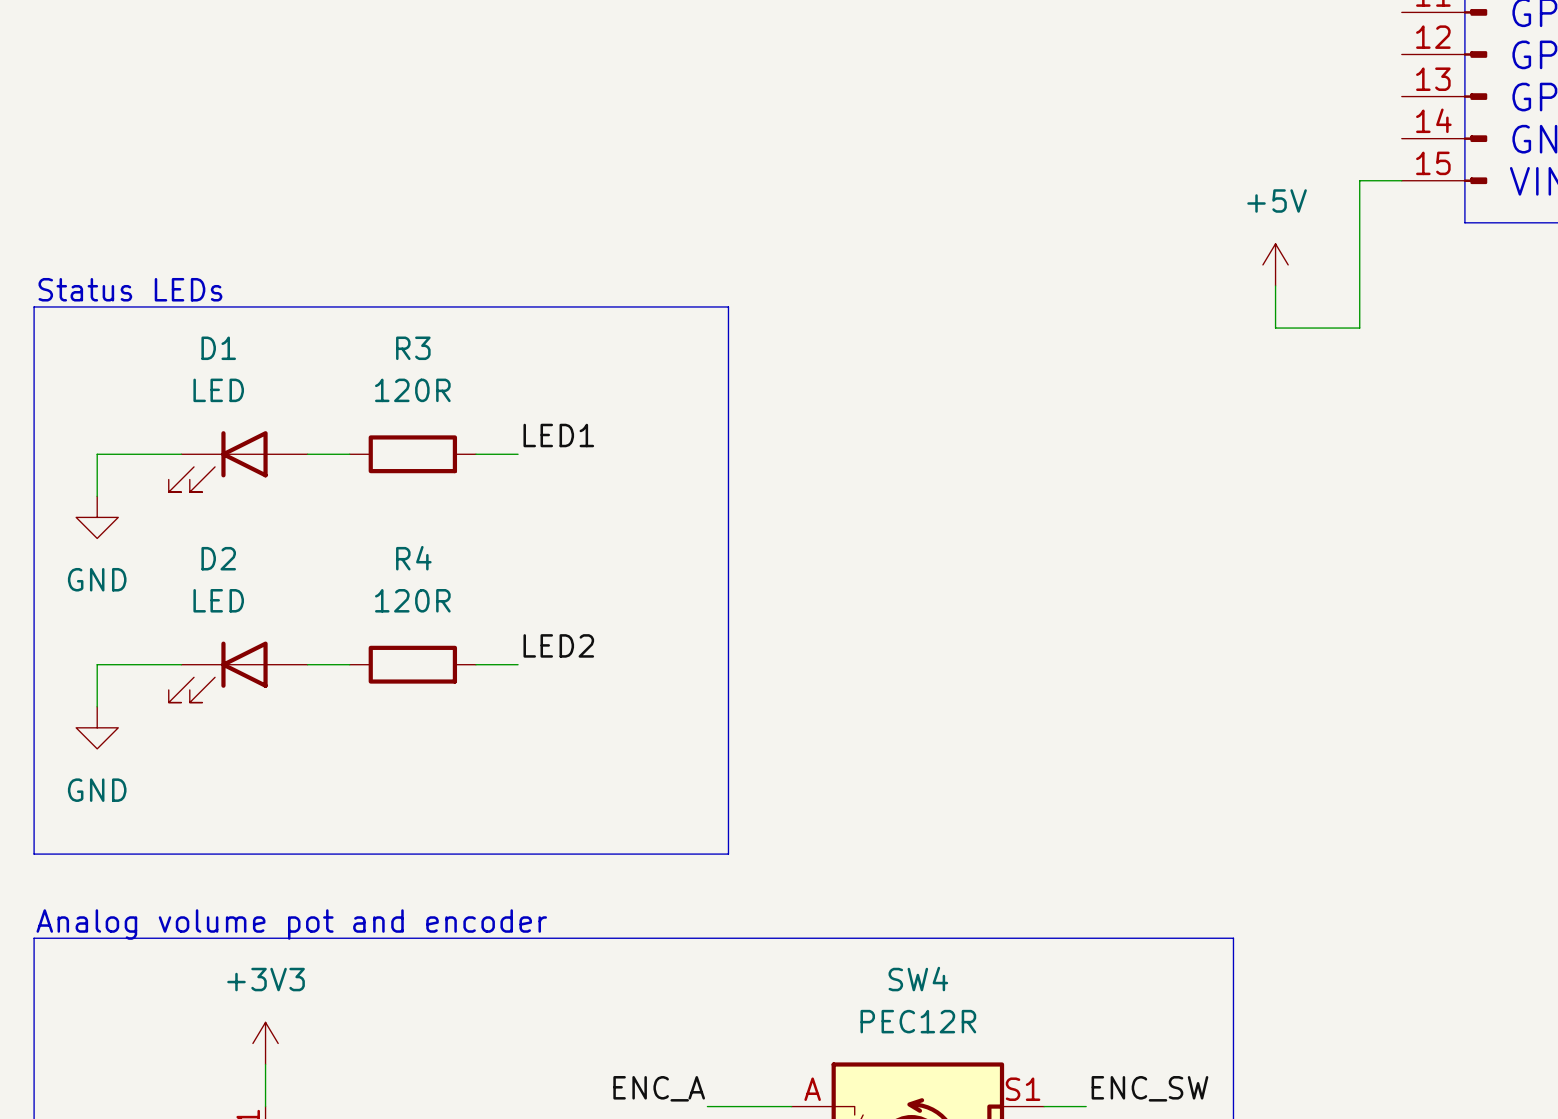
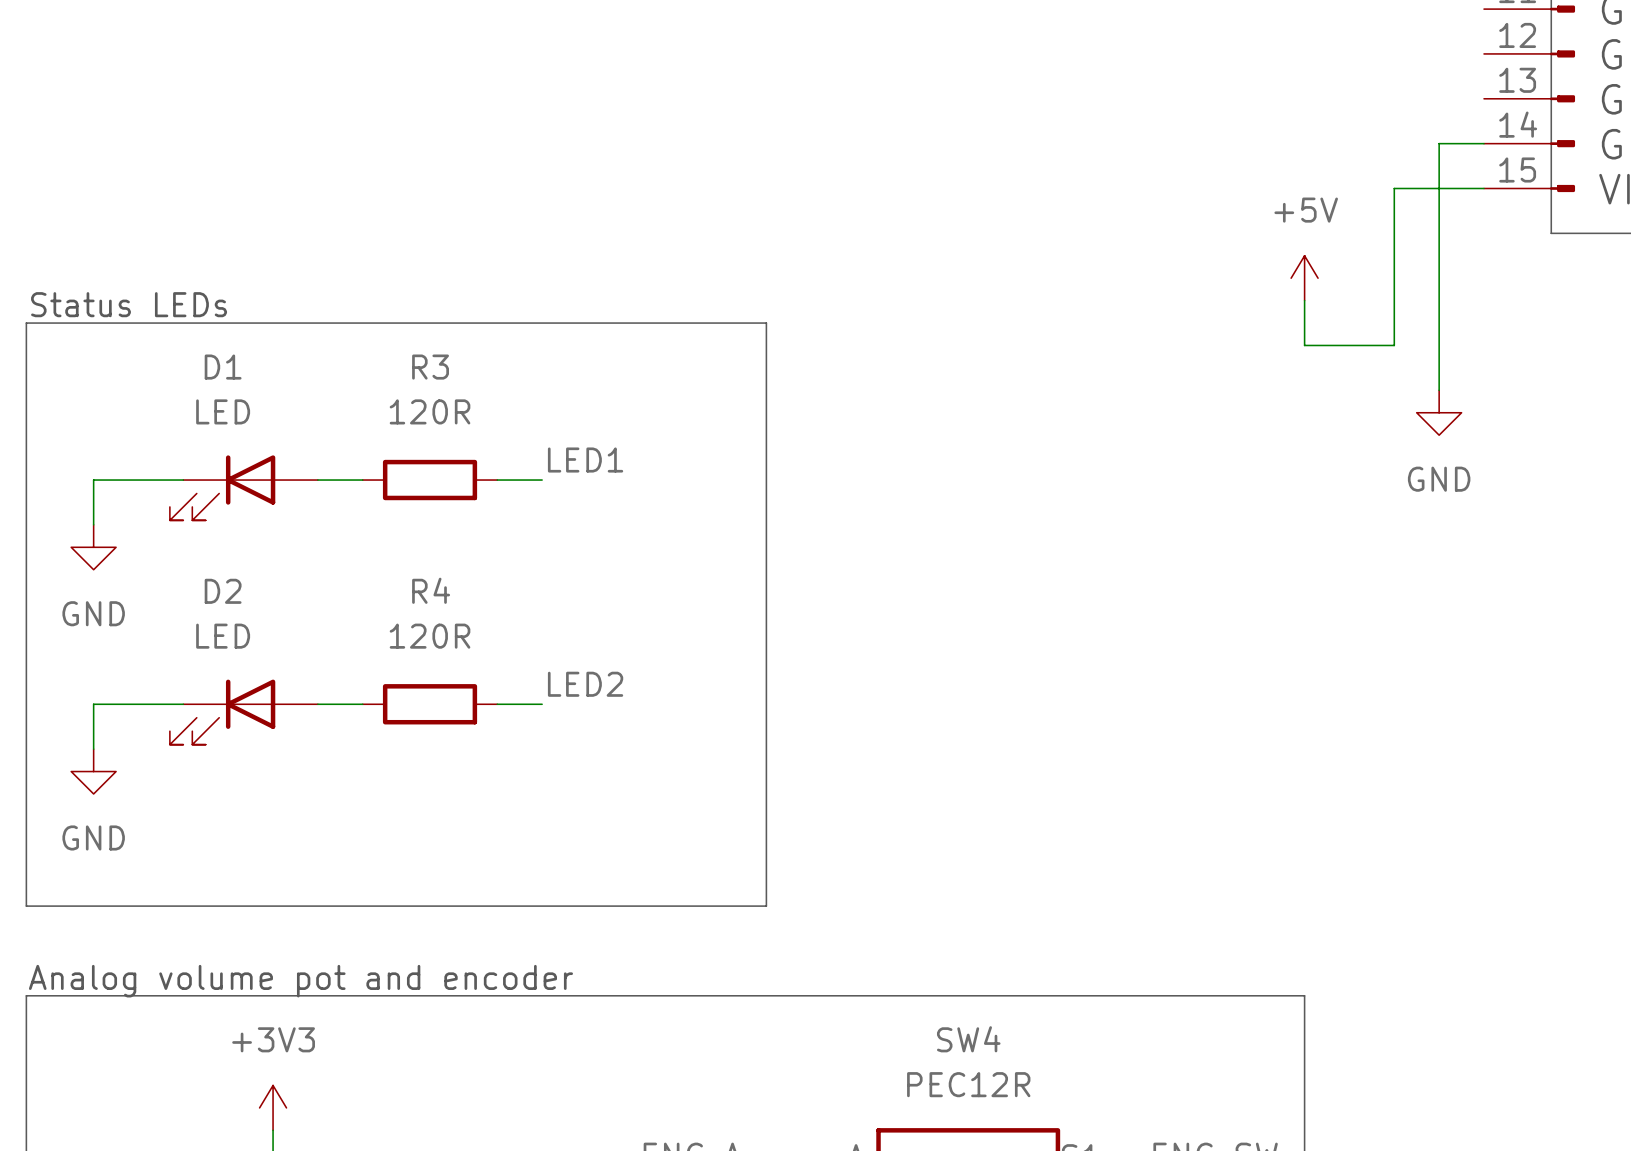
wire: none -> (1483, 143) (1439, 143) (1439, 188) (1394, 188) (1394, 345)
power symbol position: +5V (1275, 264) -> +5V (1304, 278)
wire: (1275, 285) (1275, 328) -> (1304, 300) (1304, 345) (1349, 345)
wire: (1317, 328) (1359, 328) -> (1439, 390) (1439, 345)
power symbol: none -> GND (1439, 412)

